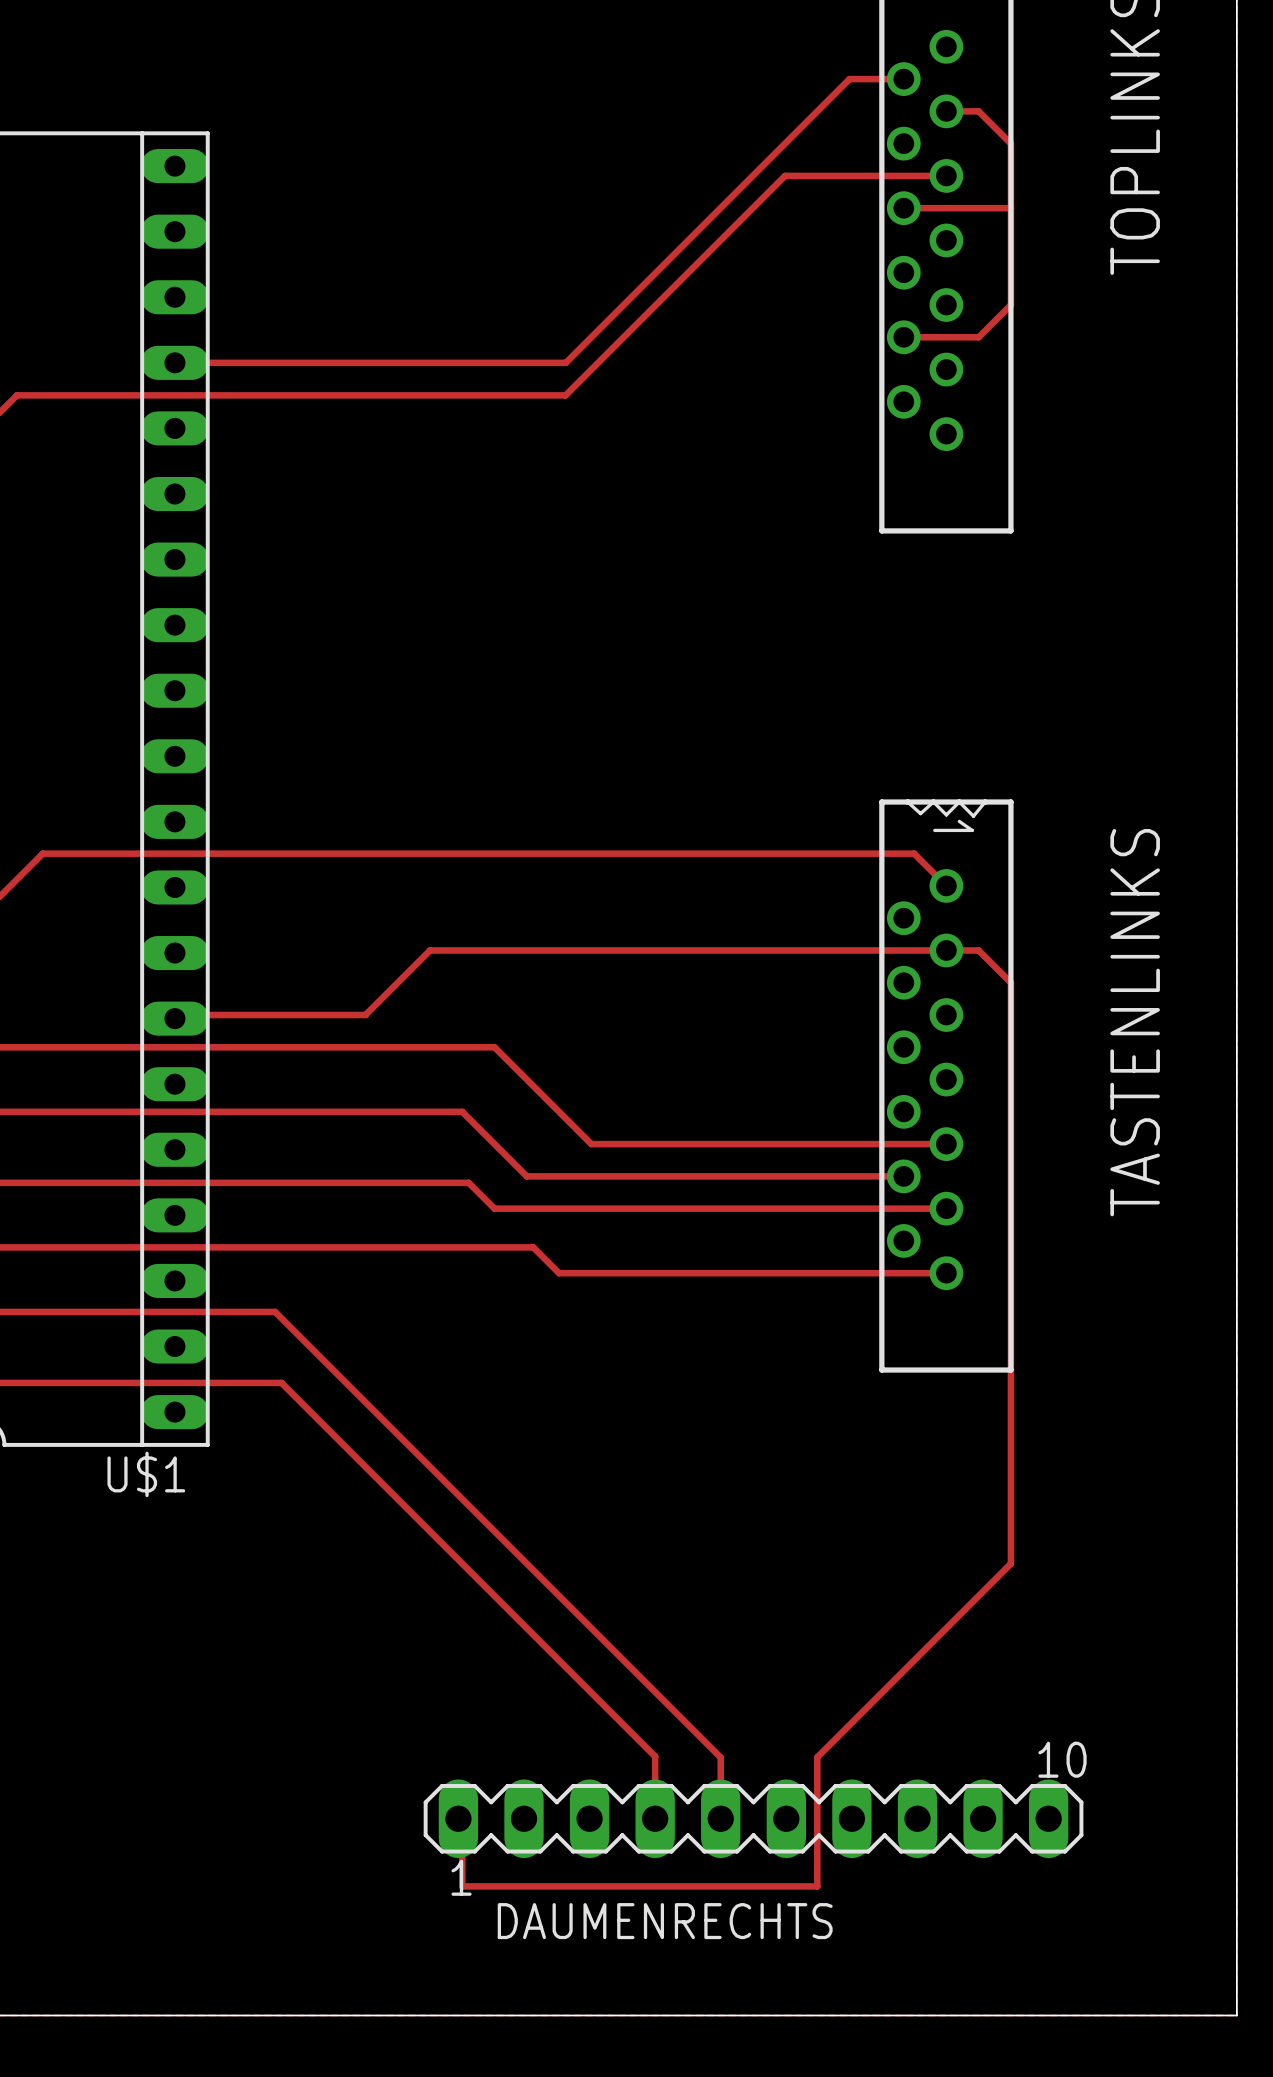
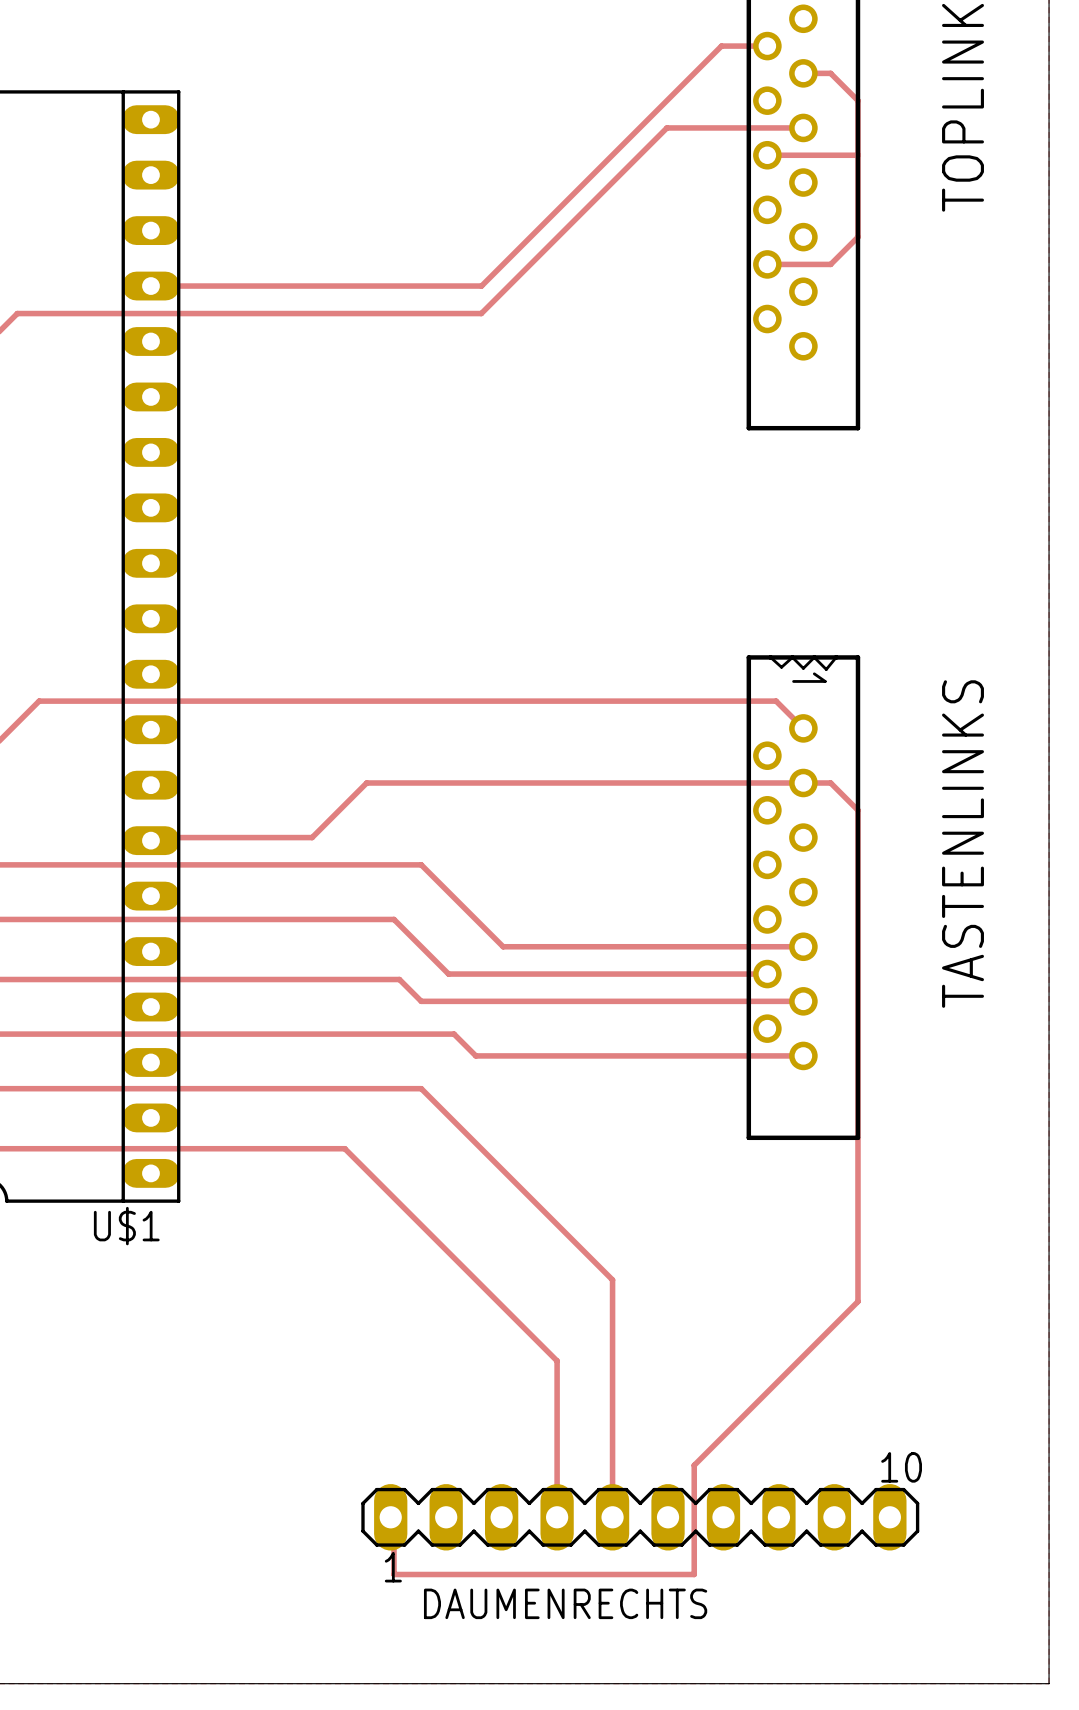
track: (275, 1311) (720, 1757) -> (235, 1088) (421, 1088) (612, 1279) (612, 1465)
track: (281, 1382) (655, 1756) -> (241, 1148) (344, 1148) (557, 1360) (557, 1464)

